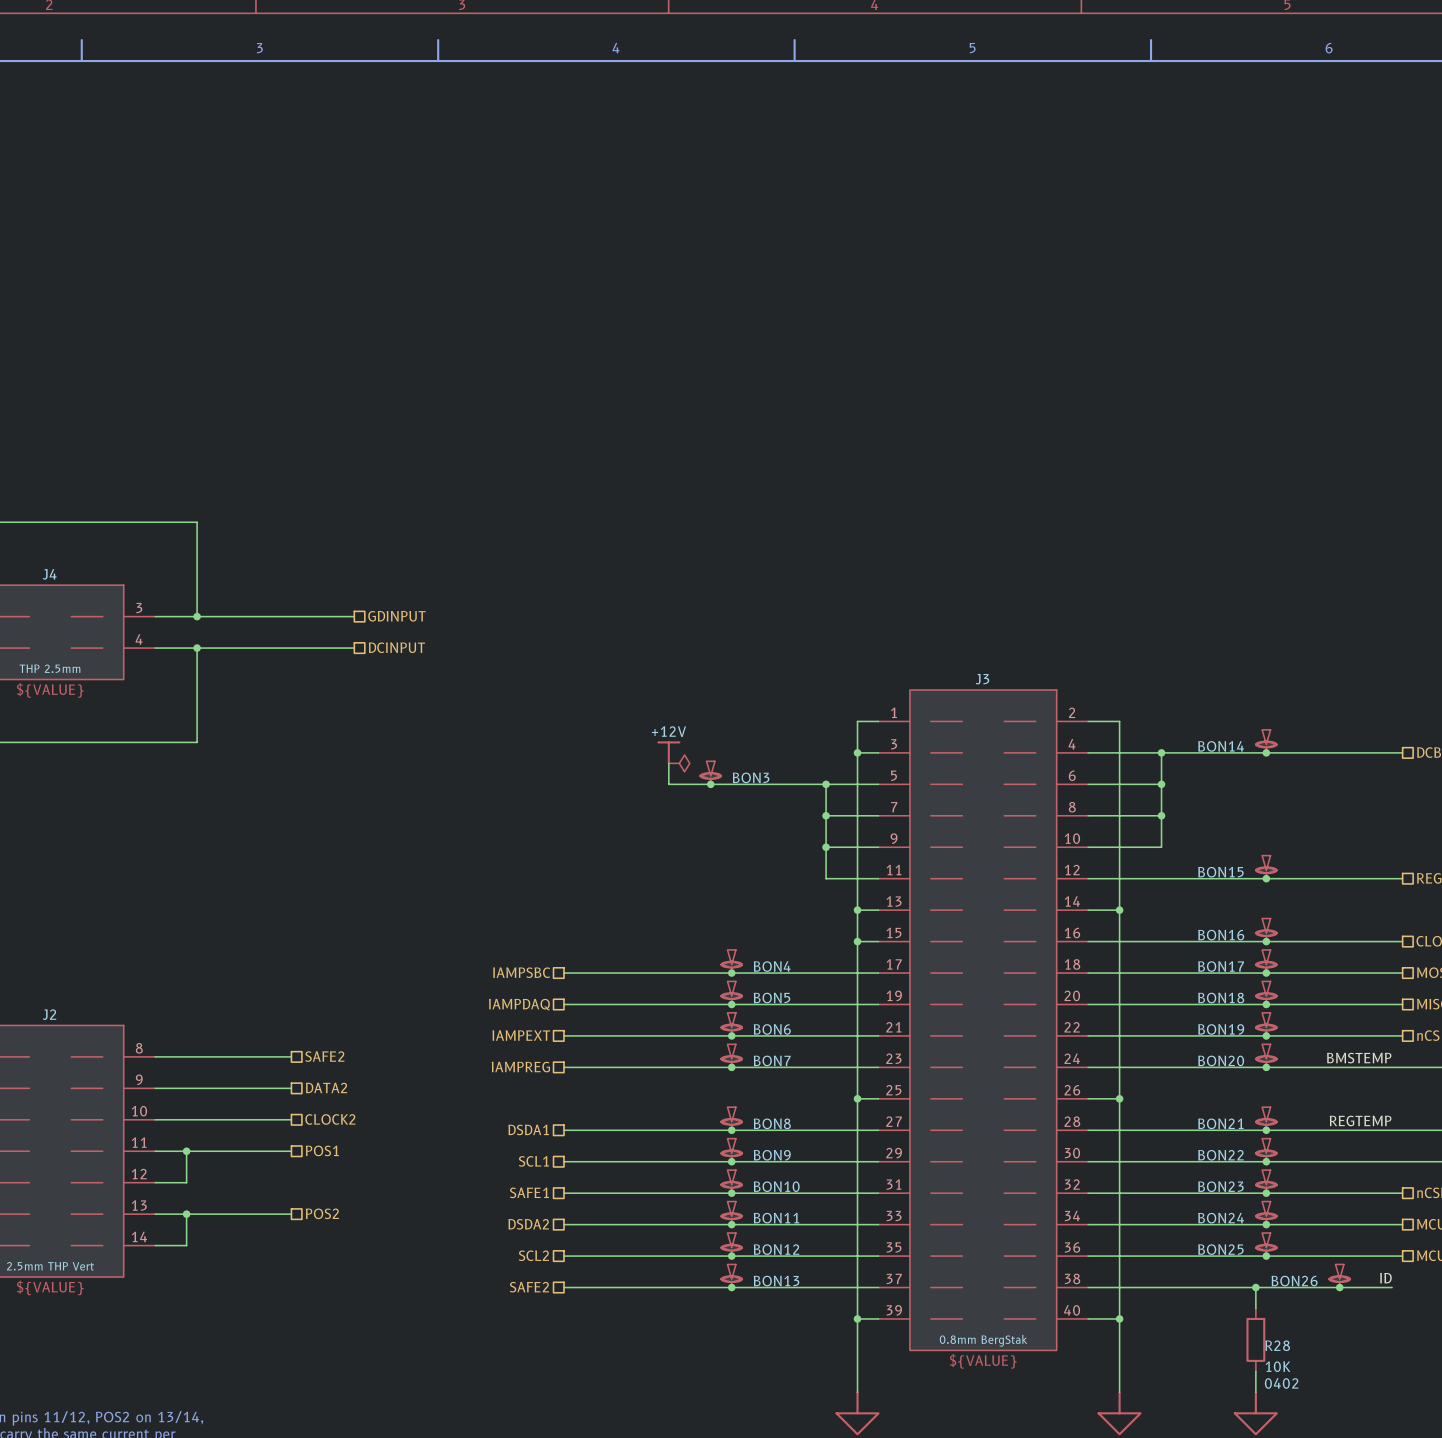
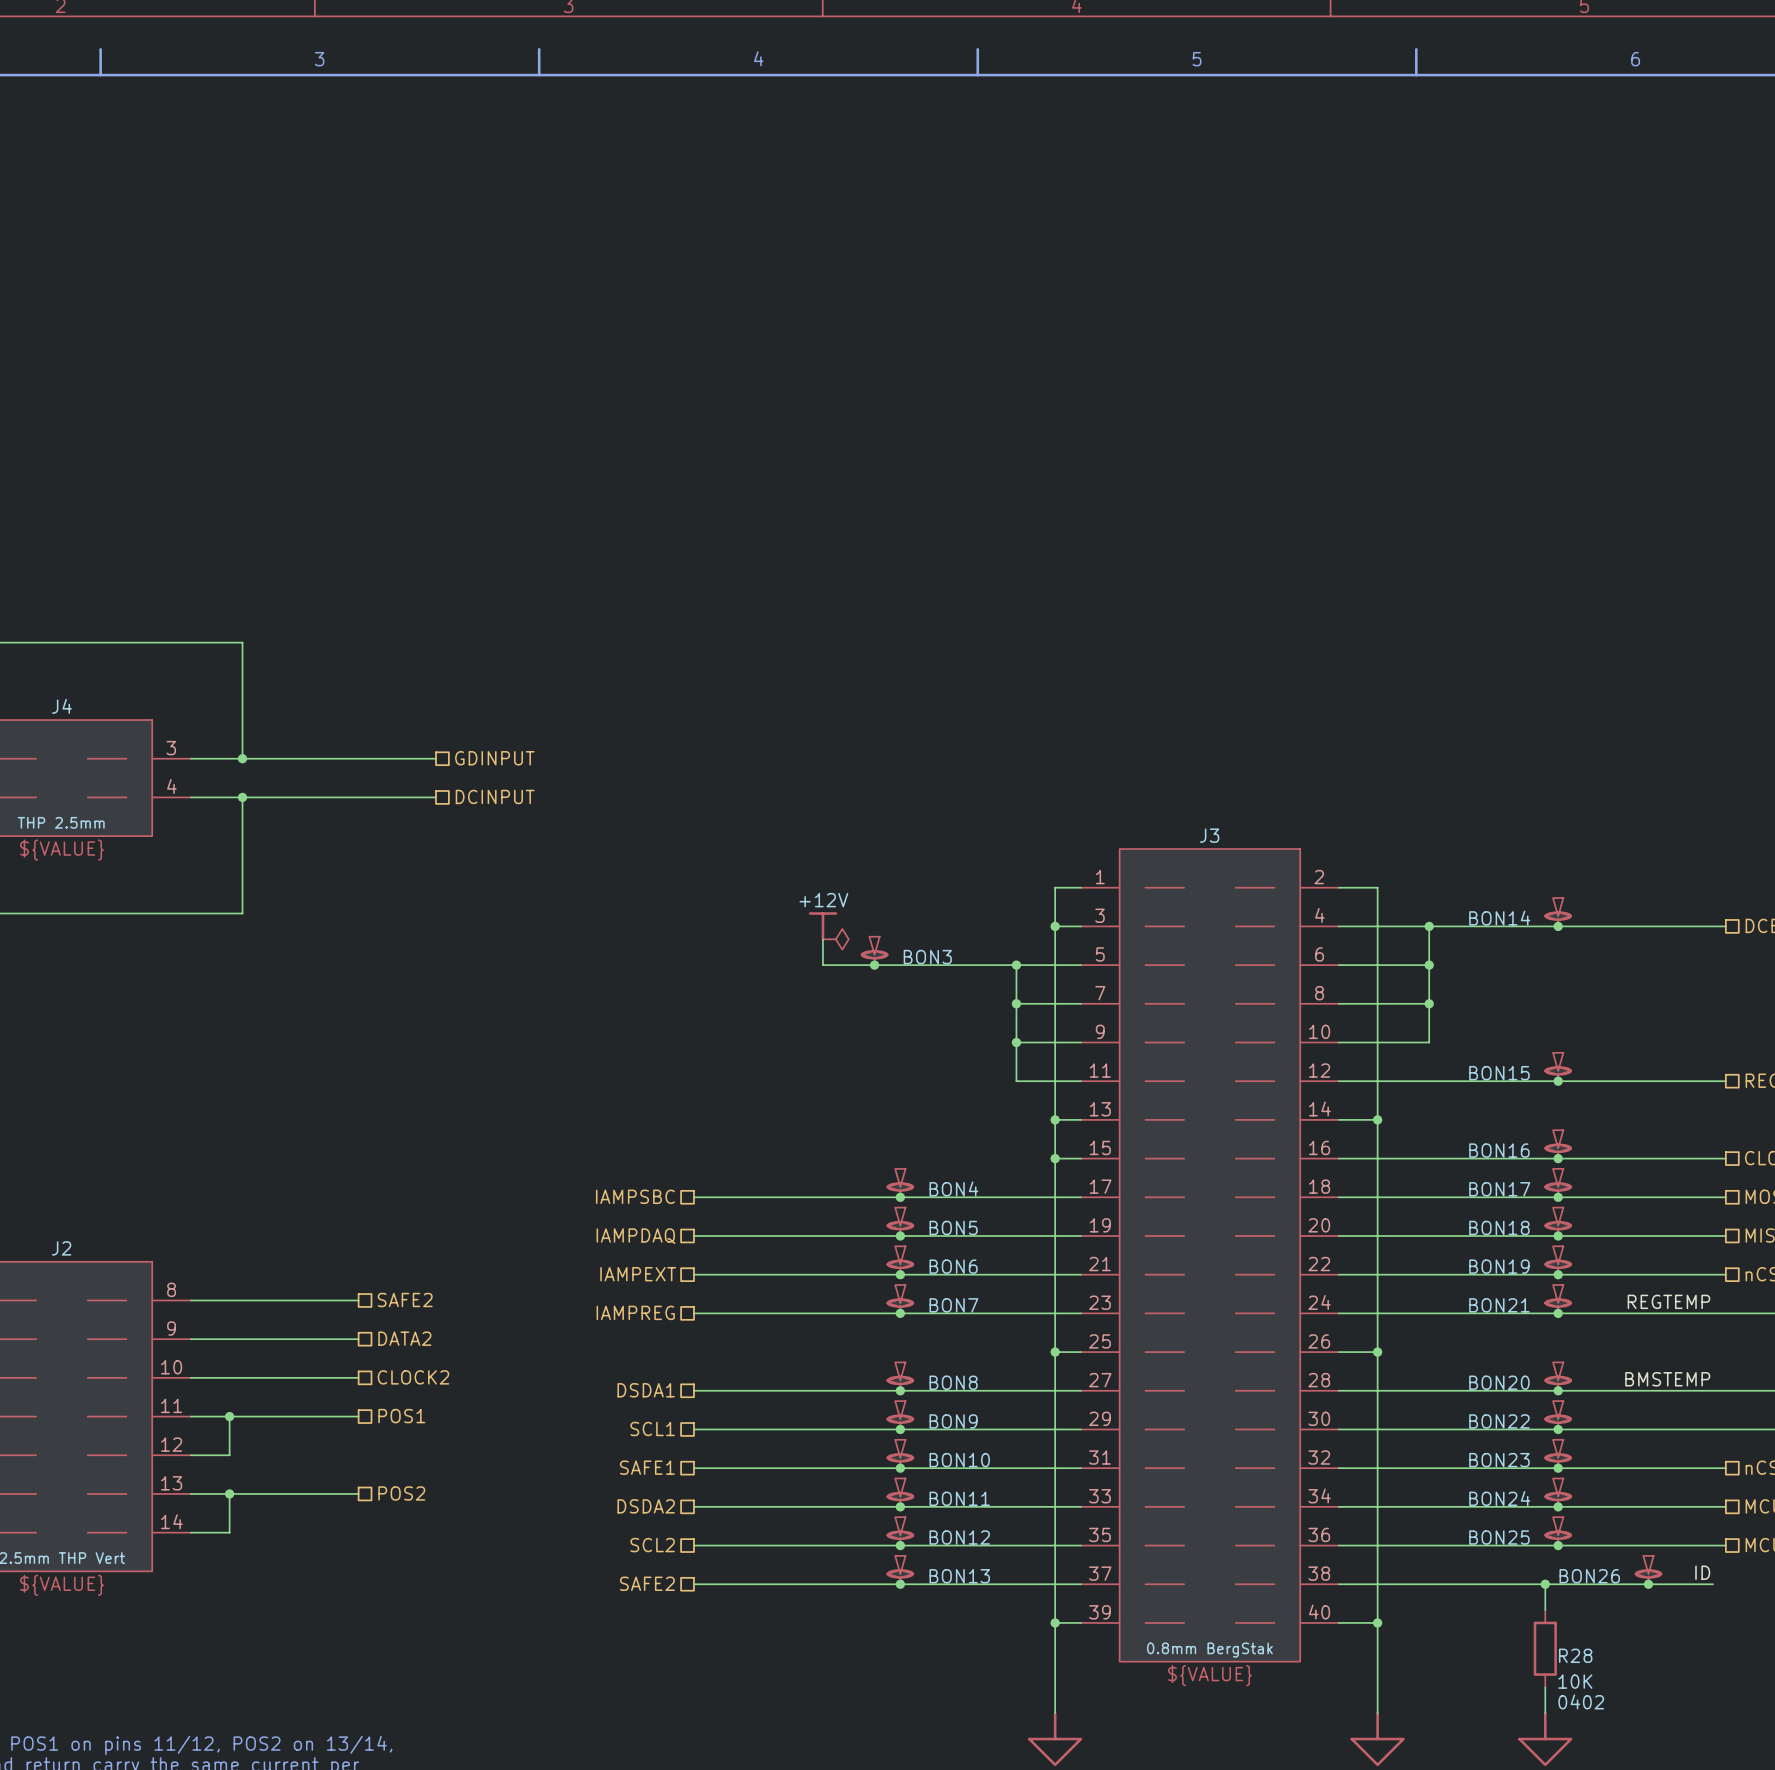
label: BMSTEMP (1359, 1058) -> REGTEMP (1668, 1301)
BON20 name: BON20 (1221, 1060) -> BON21 (1499, 1305)
label: REGTEMP (1360, 1120) -> BMSTEMP (1667, 1379)
BON21 name: BON21 (1220, 1123) -> BON20 (1499, 1382)

